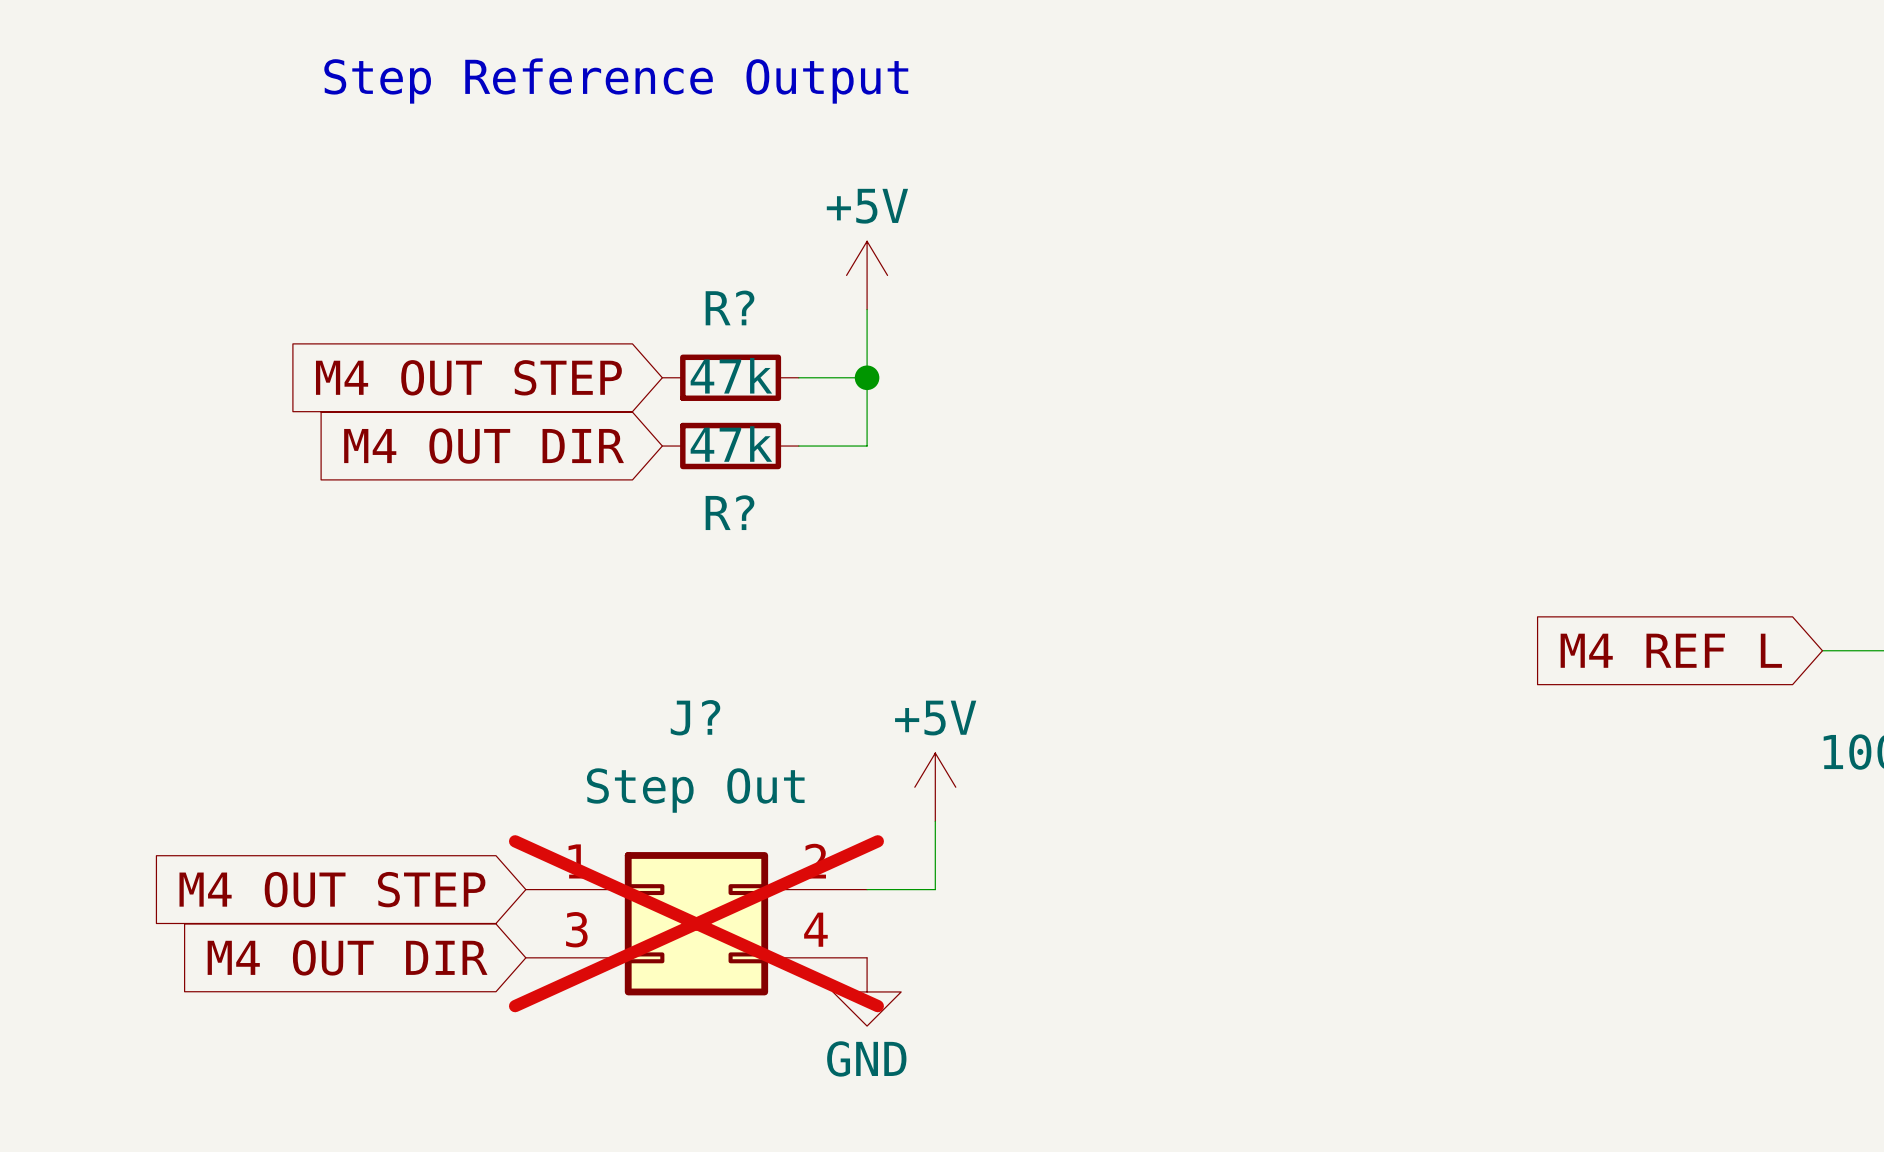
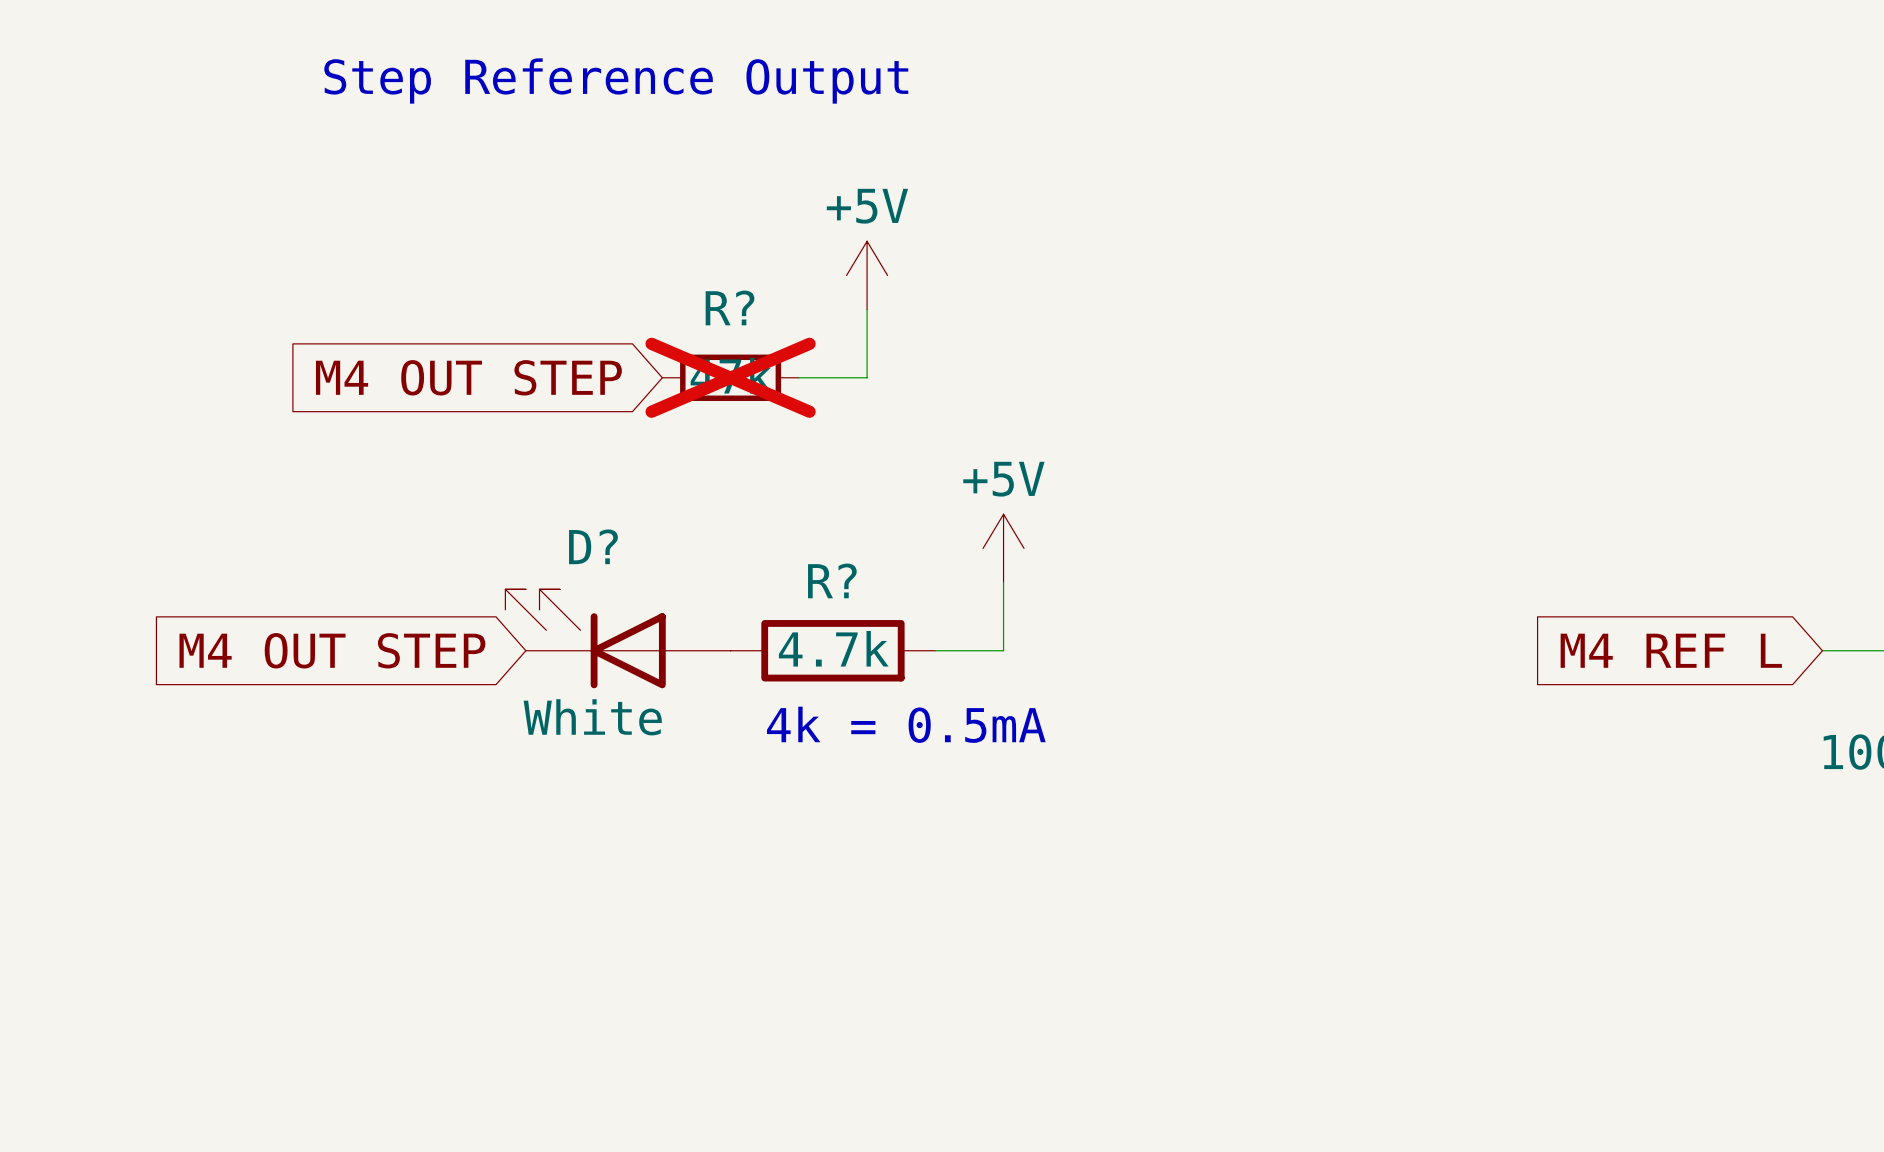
R? do-not-place cross: none -> (730, 377)
wire: (867, 377) (867, 446) (798, 446) -> (1003, 582) (1003, 650) (935, 650)
junction: (867, 377) -> none
global label: M4 OUT DIR (484, 446) -> none
R?: 47k (730, 446) -> none
D?: none -> White (617, 638)
R?: none -> 4.7k (832, 650)
text: none -> 4k = 0.5mA (906, 724)
power symbol position: +5V (935, 787) -> +5V (1003, 548)
wire: (935, 821) (935, 889) (867, 889) -> none
global label position: M4 OUT STEP (332, 889) -> M4 OUT STEP (332, 650)
J?: Step Out (696, 923) -> none
global label: M4 OUT DIR (347, 957) -> none
power symbol: GND (867, 991) -> none

